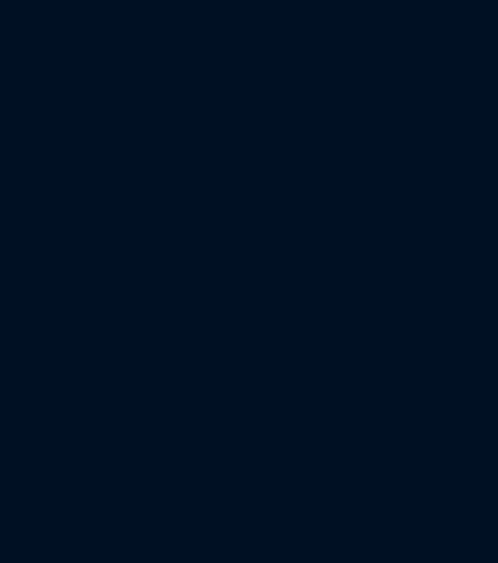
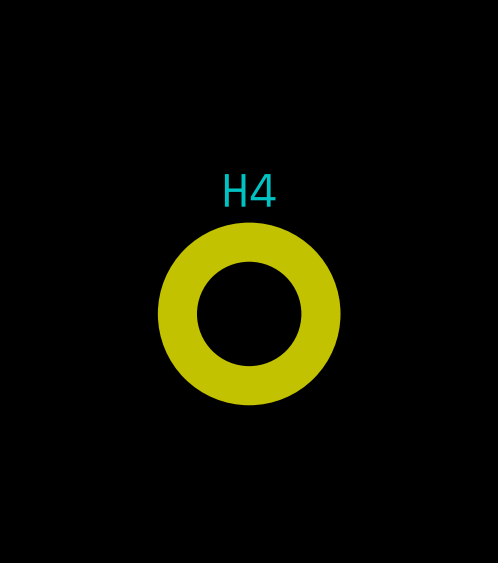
H4: none -> (249, 313)

